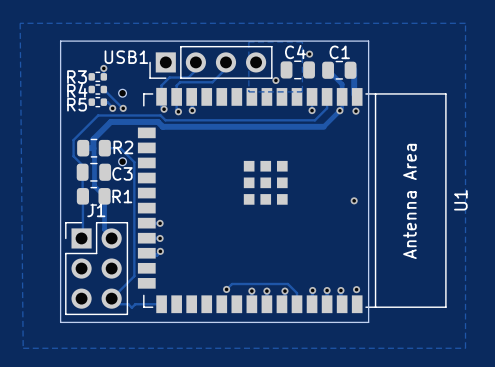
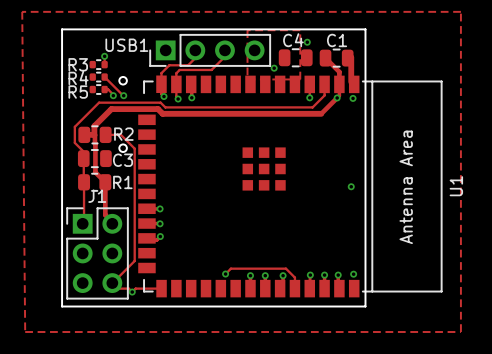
via: none -> (132, 292)

